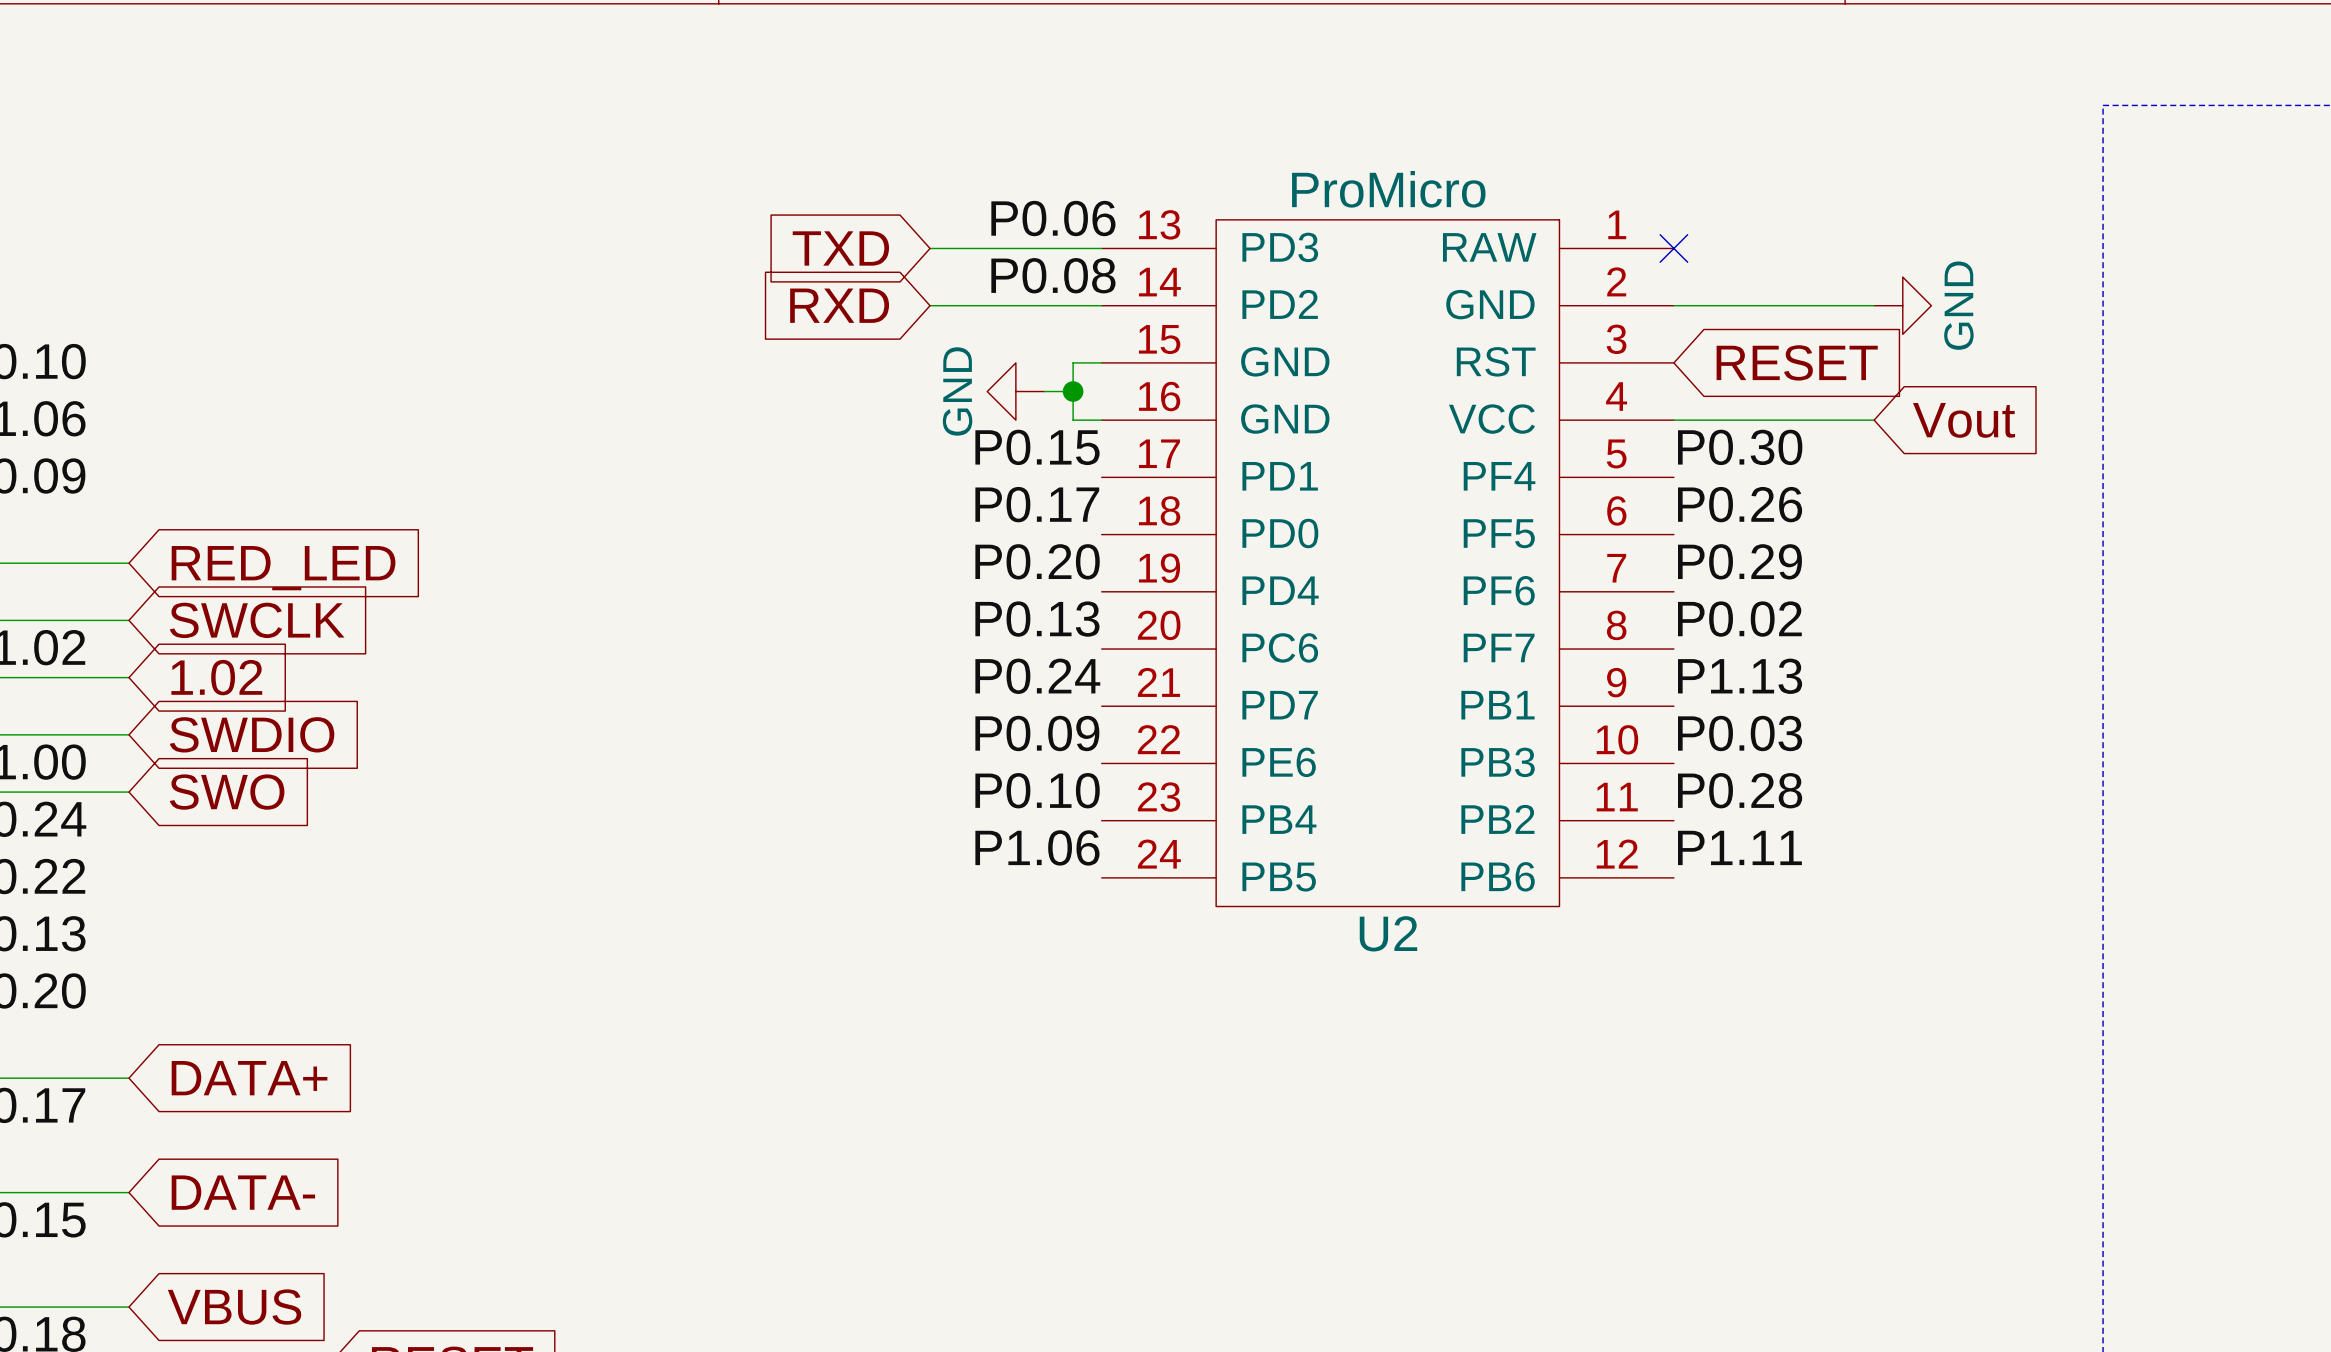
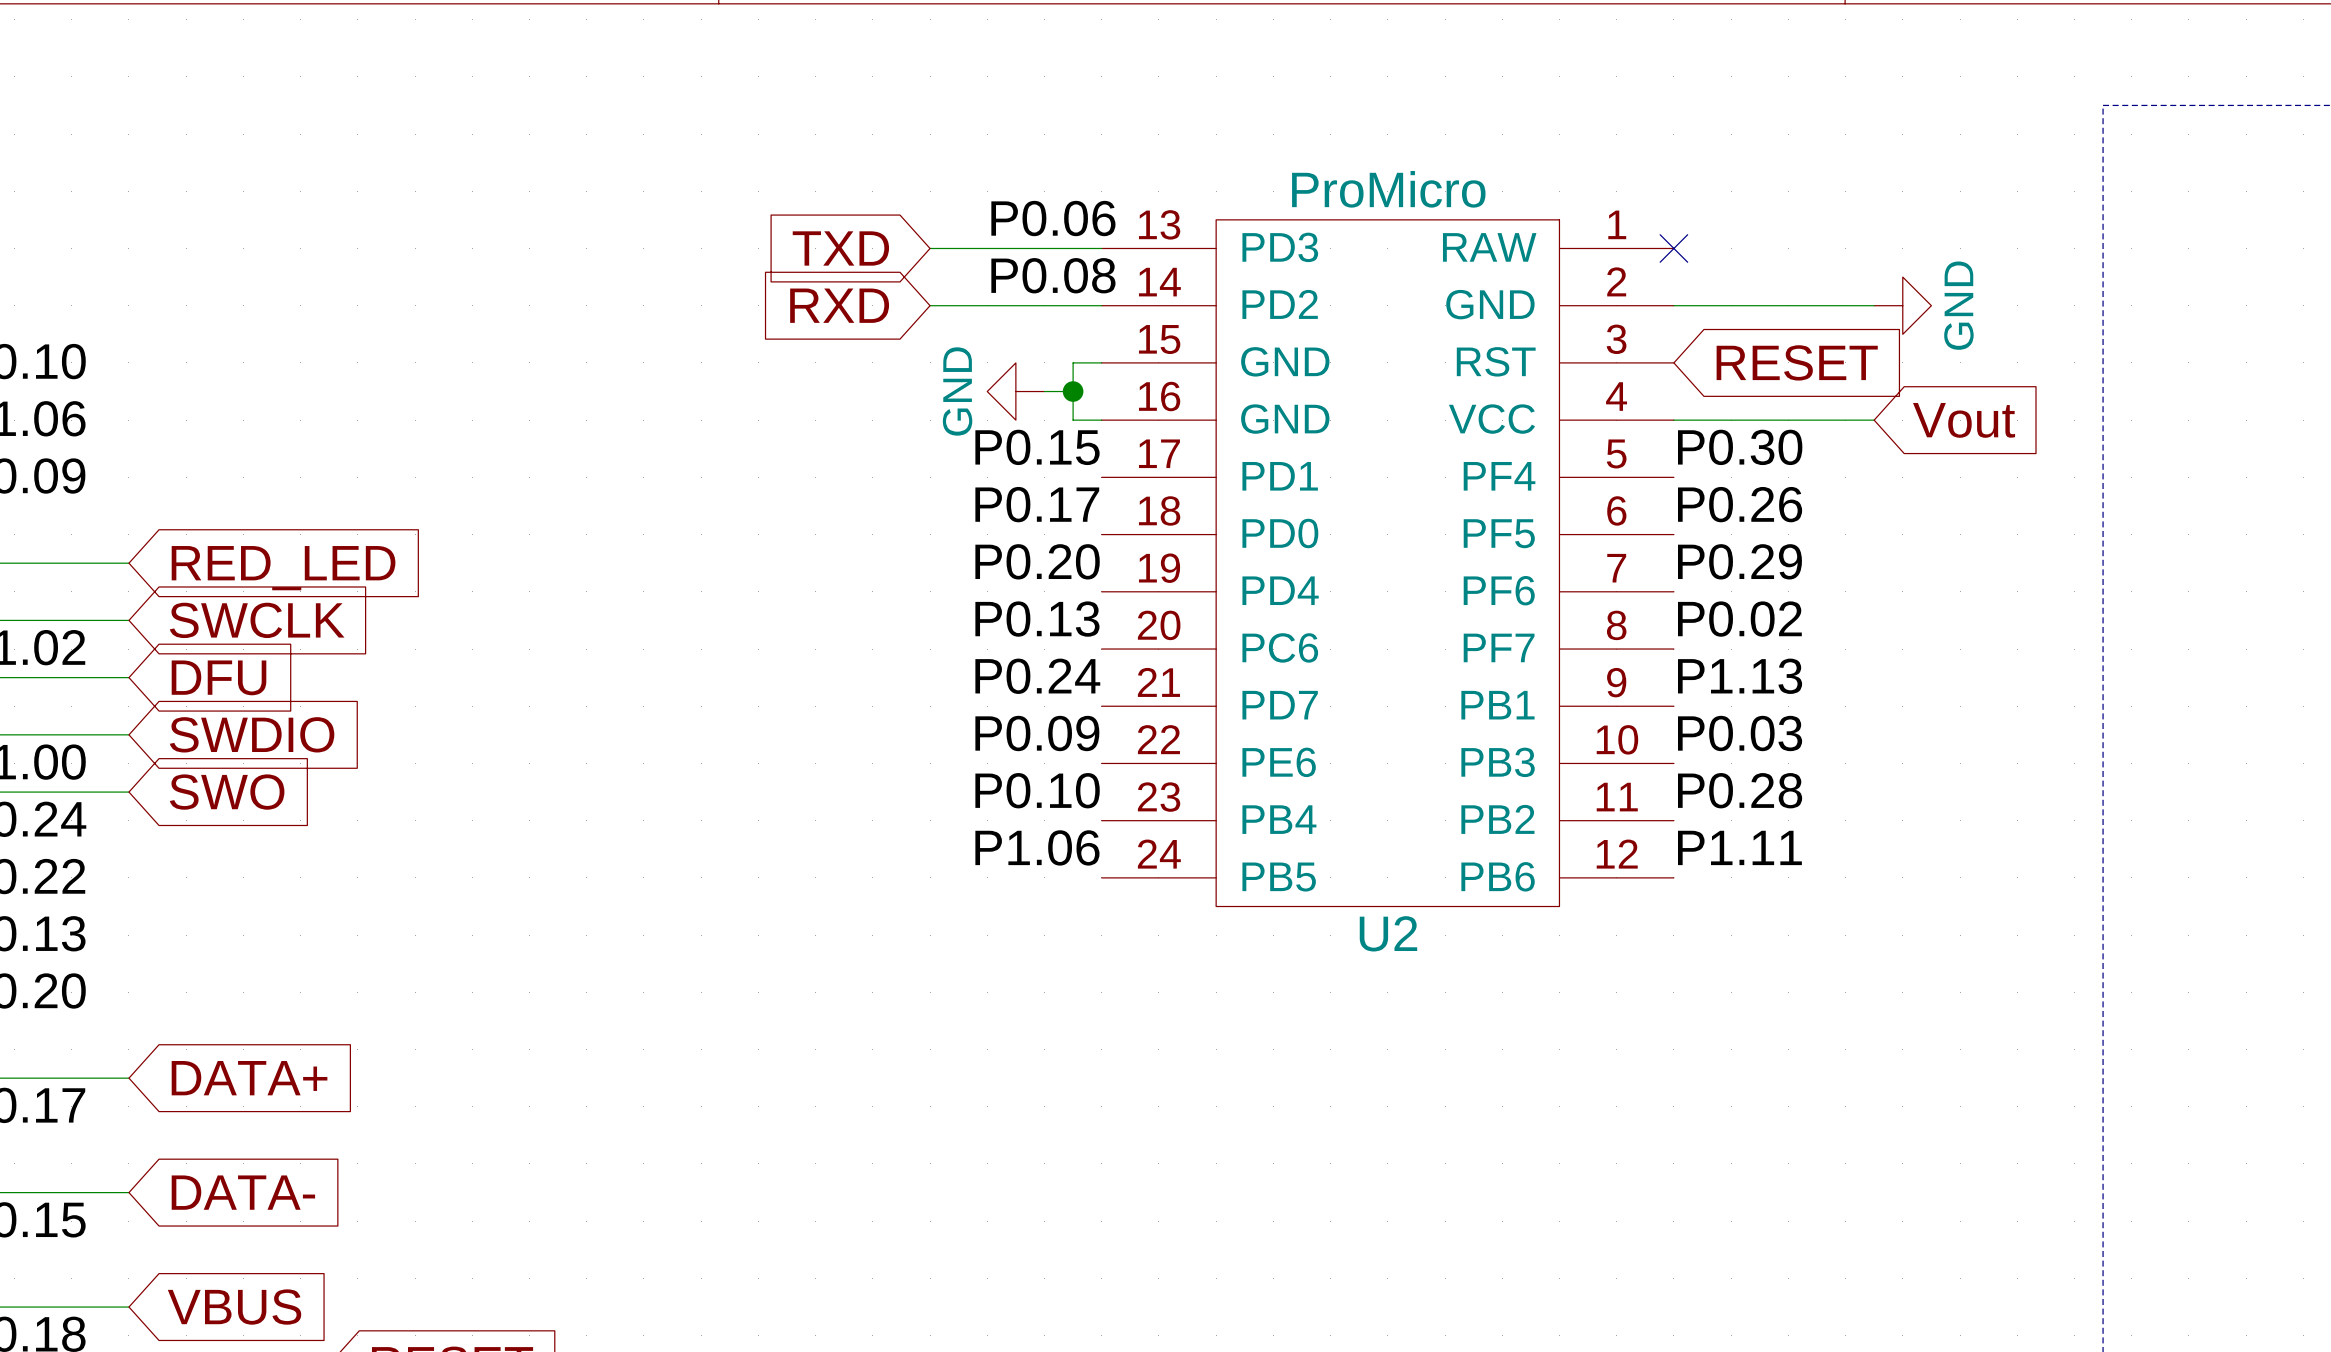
global label: 1.02 (216, 677) -> DFU (219, 677)

